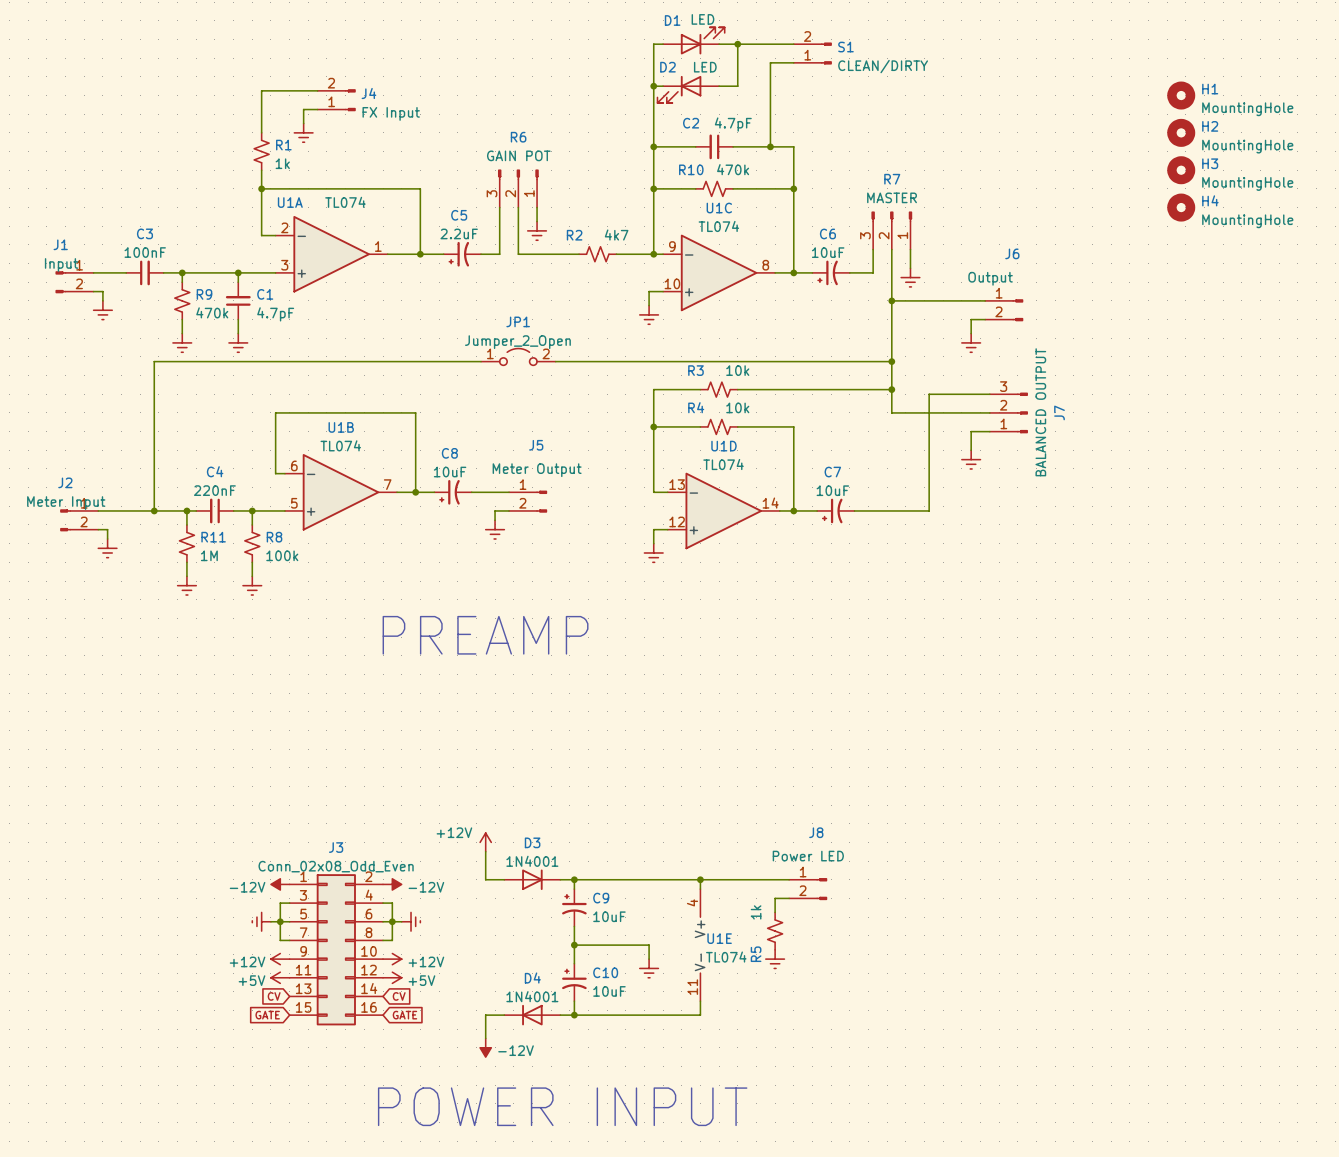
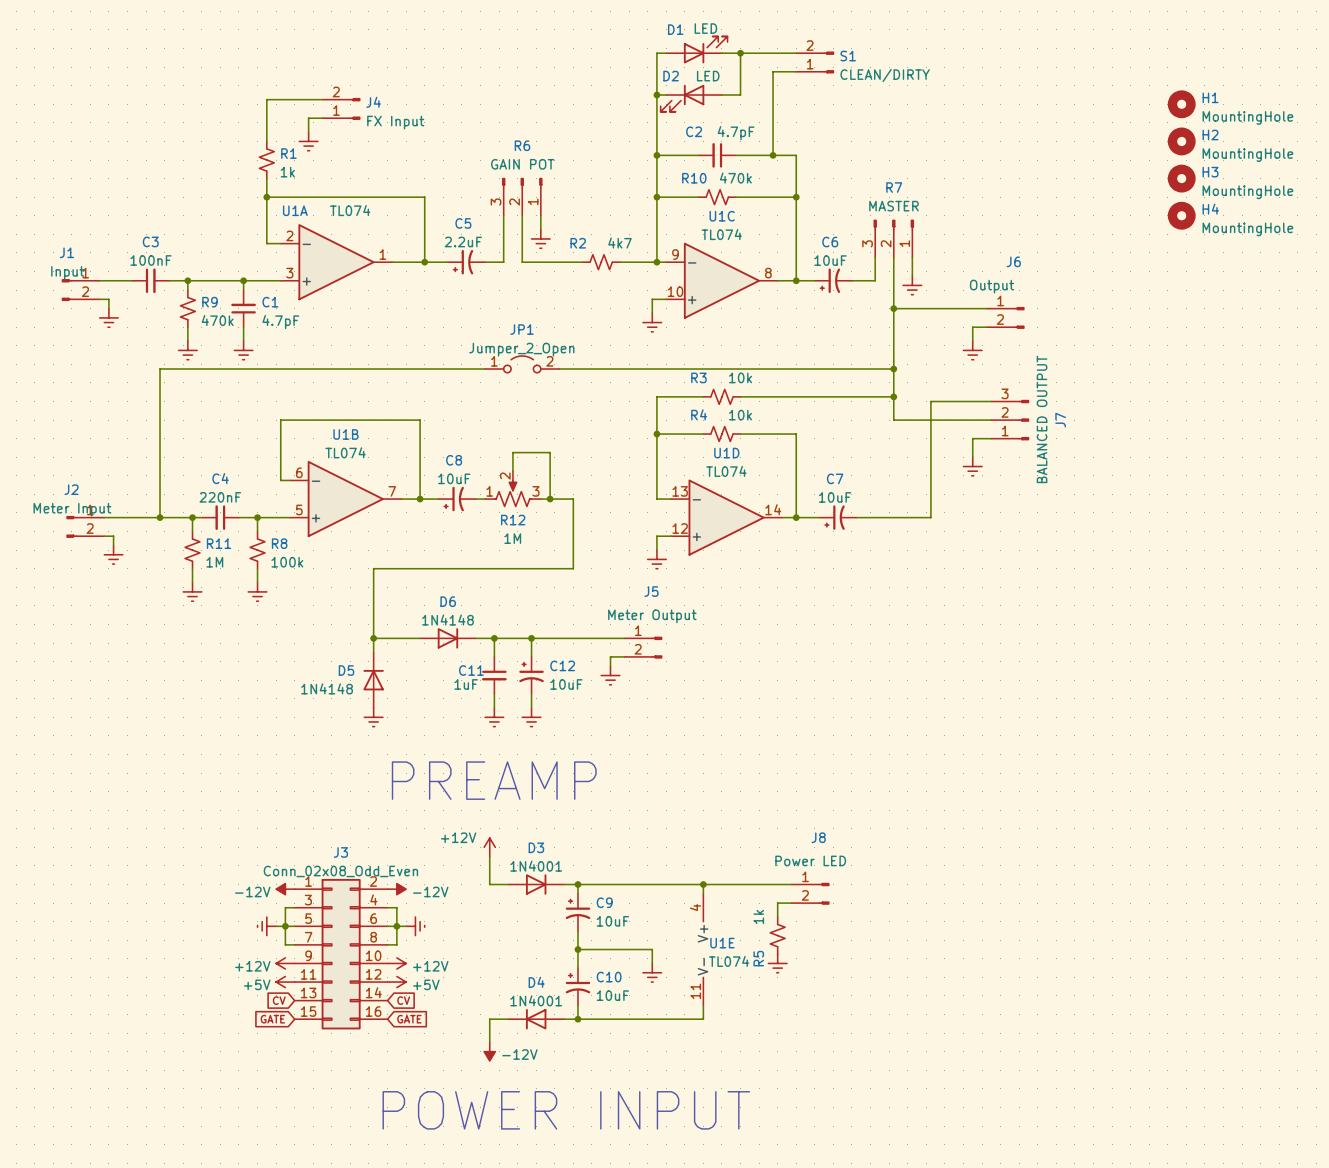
wire: none -> (512, 471) (512, 452) (550, 452) (550, 499)
R12: none -> 1M (512, 488)
wire: none -> (540, 499) (573, 499) (573, 568) (373, 568) (373, 652)
junction: none -> (550, 499)
J5 position: (527, 501) -> (643, 647)
wire: (509, 510) (495, 510) (495, 520) -> (624, 656) (610, 656) (610, 666)
power symbol: (495, 529) -> none
wire: none -> (373, 638) (420, 638)
junction: none -> (373, 638)
D6: none -> 1N4148 (447, 638)
wire: none -> (475, 638) (624, 638)
wire: none -> (494, 638) (494, 656)
junction: none -> (494, 638)
wire: none -> (531, 638) (531, 656)
junction: none -> (531, 638)
text position: PREAMP (485, 635) -> PREAMP (494, 780)
C11: none -> 1uF (494, 675)
C12: none -> 10uF (531, 675)
power symbol: none -> (610, 675)
D5: none -> 1N4148 (373, 680)
wire: none -> (494, 694) (494, 708)
wire: none -> (531, 694) (531, 708)
power symbol: none -> (373, 717)
power symbol: none -> (494, 717)
power symbol: none -> (531, 717)

